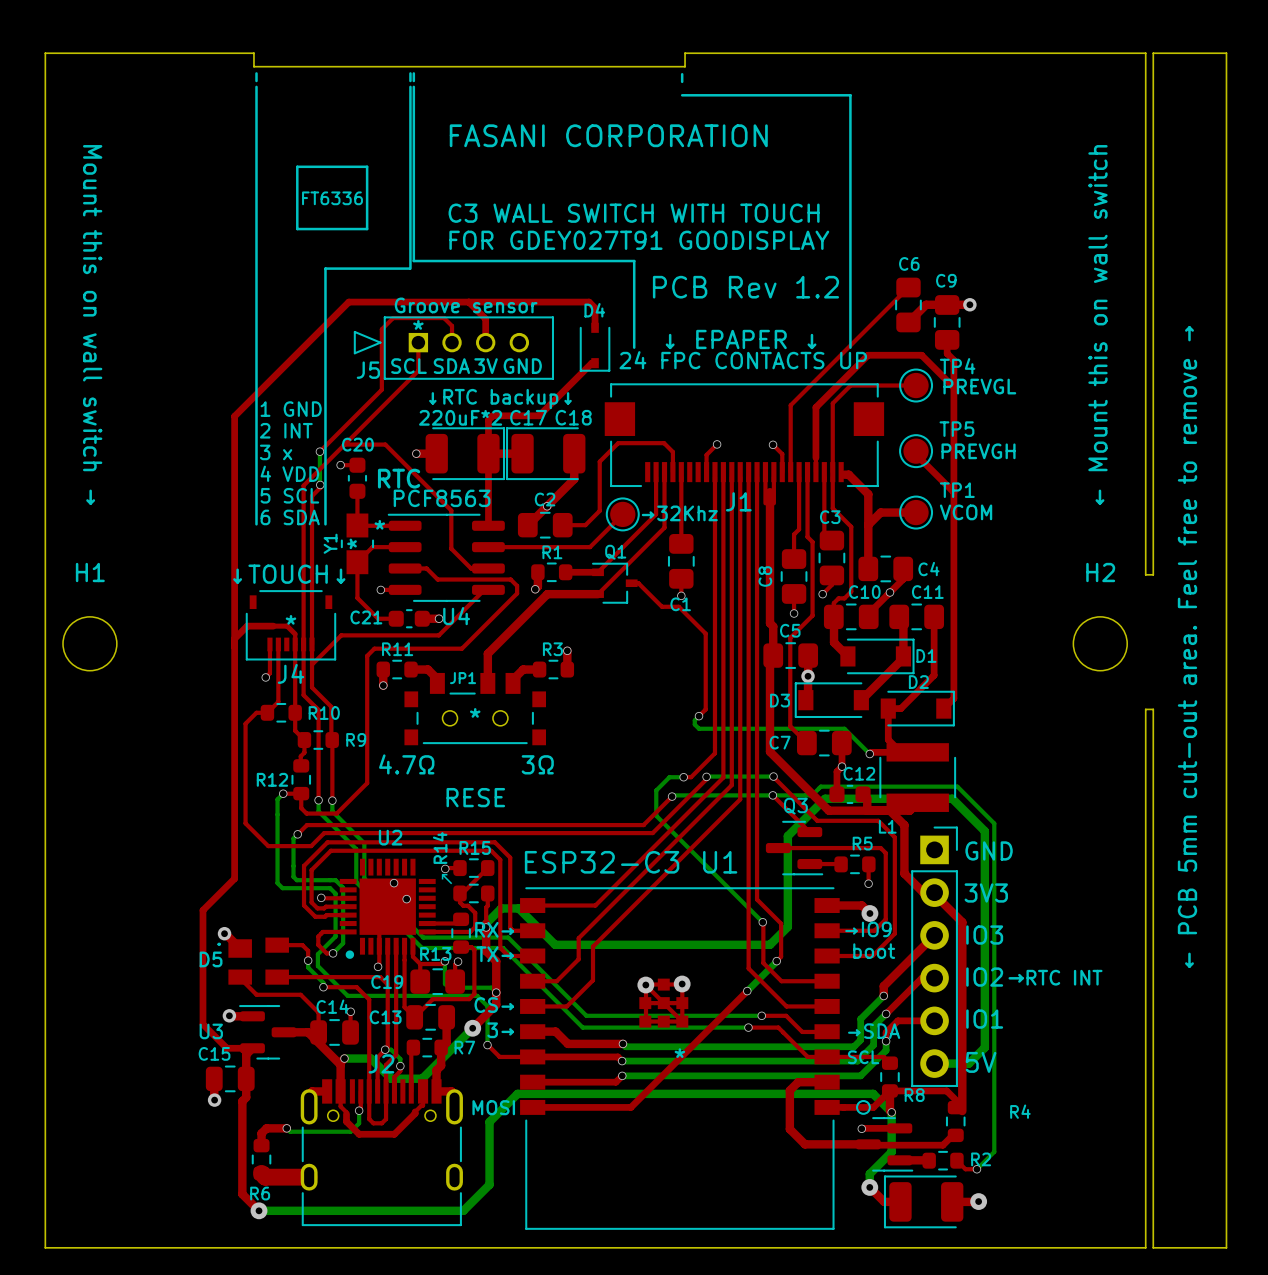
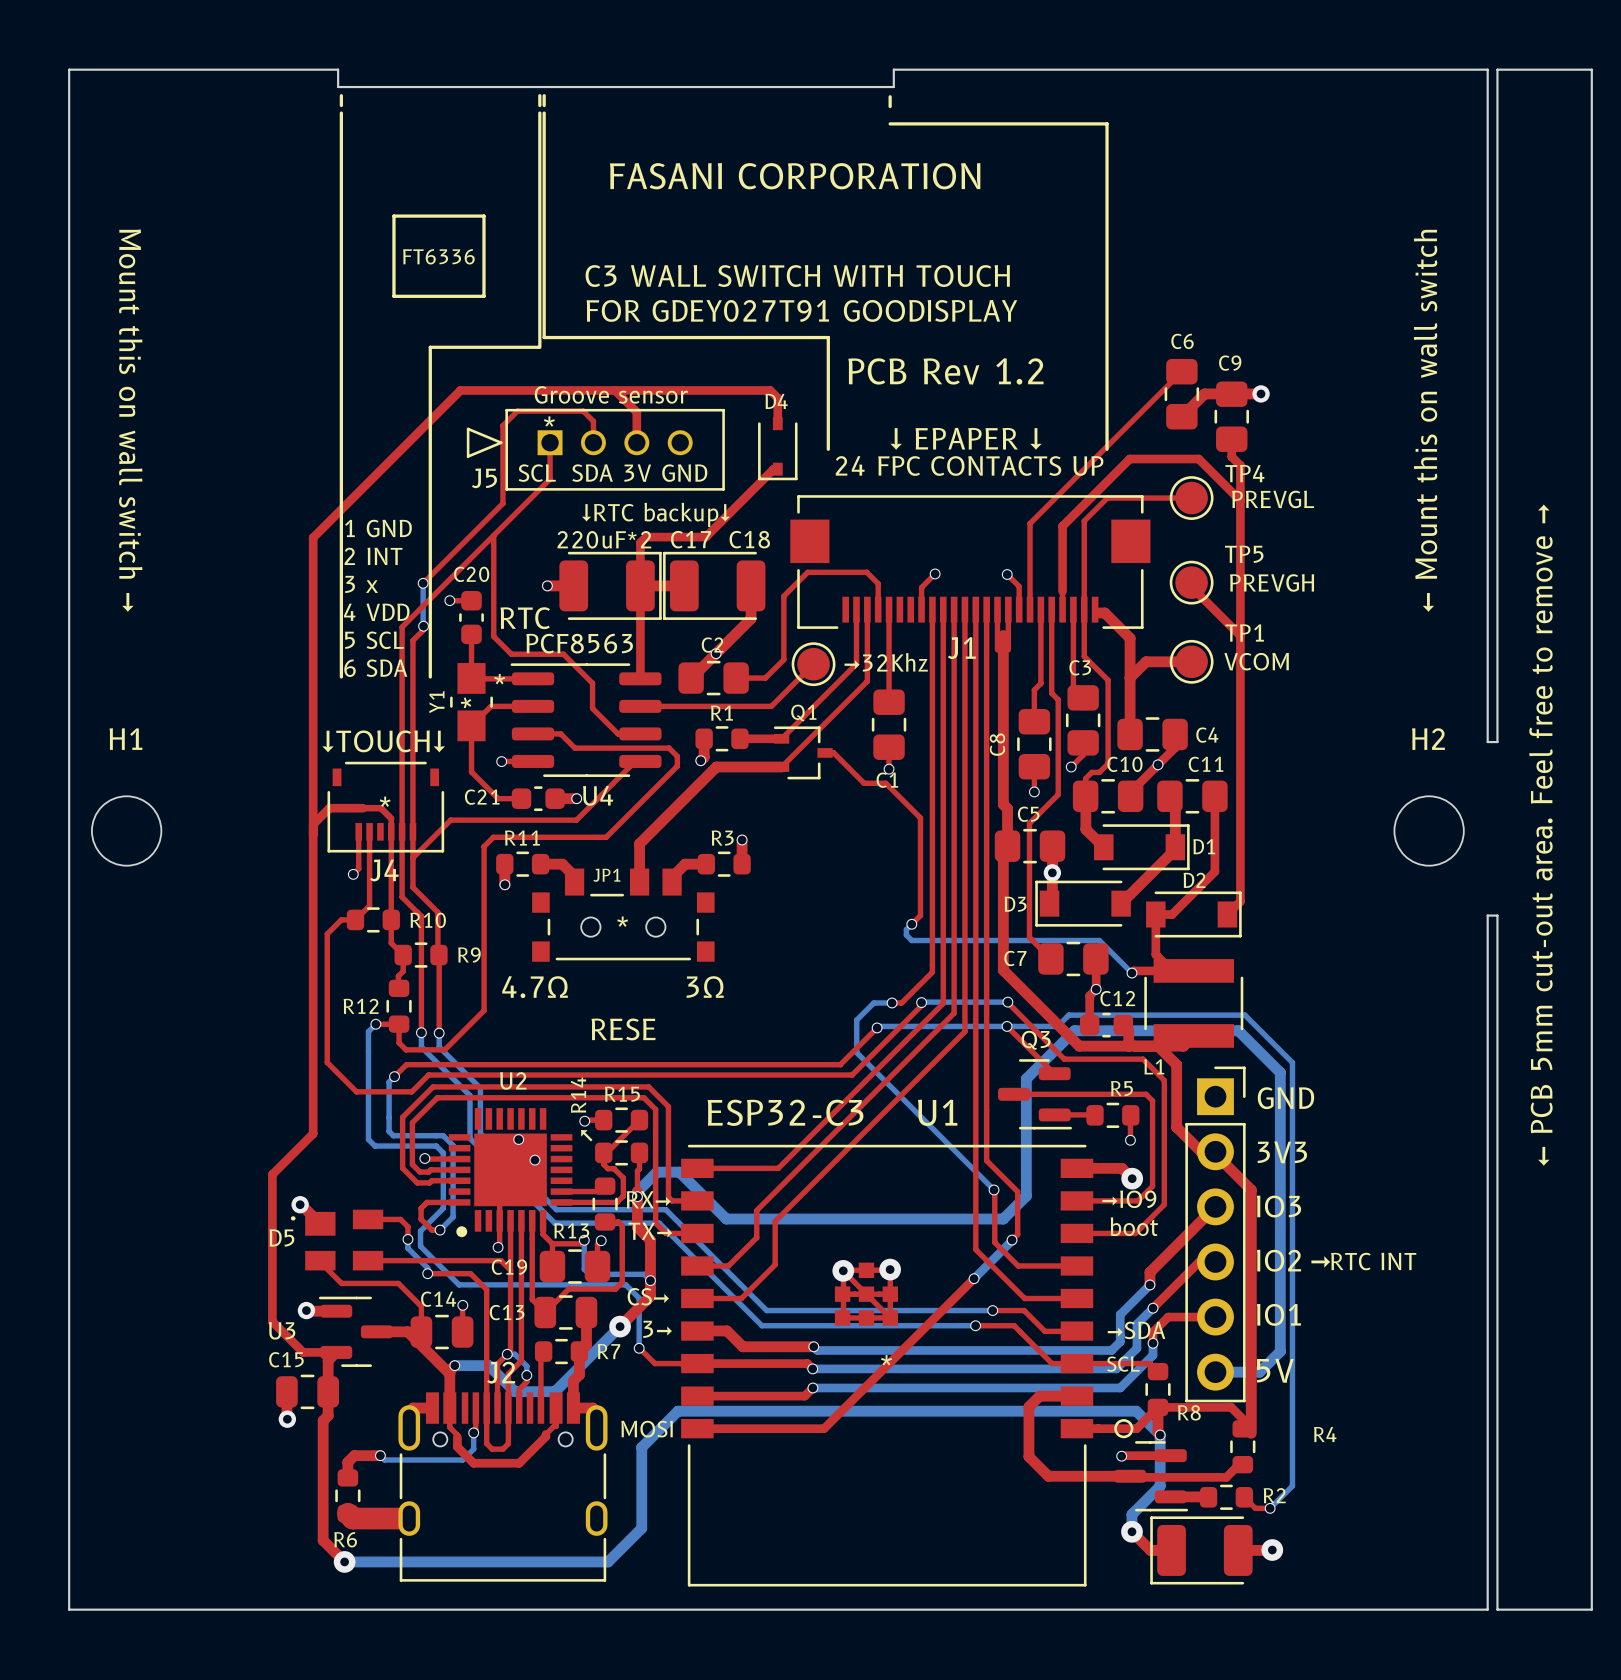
top track: (344, 444) (385, 444) (451, 510) (451, 529) -> (493, 535) (493, 636) (511, 654) (563, 654) (592, 683)

